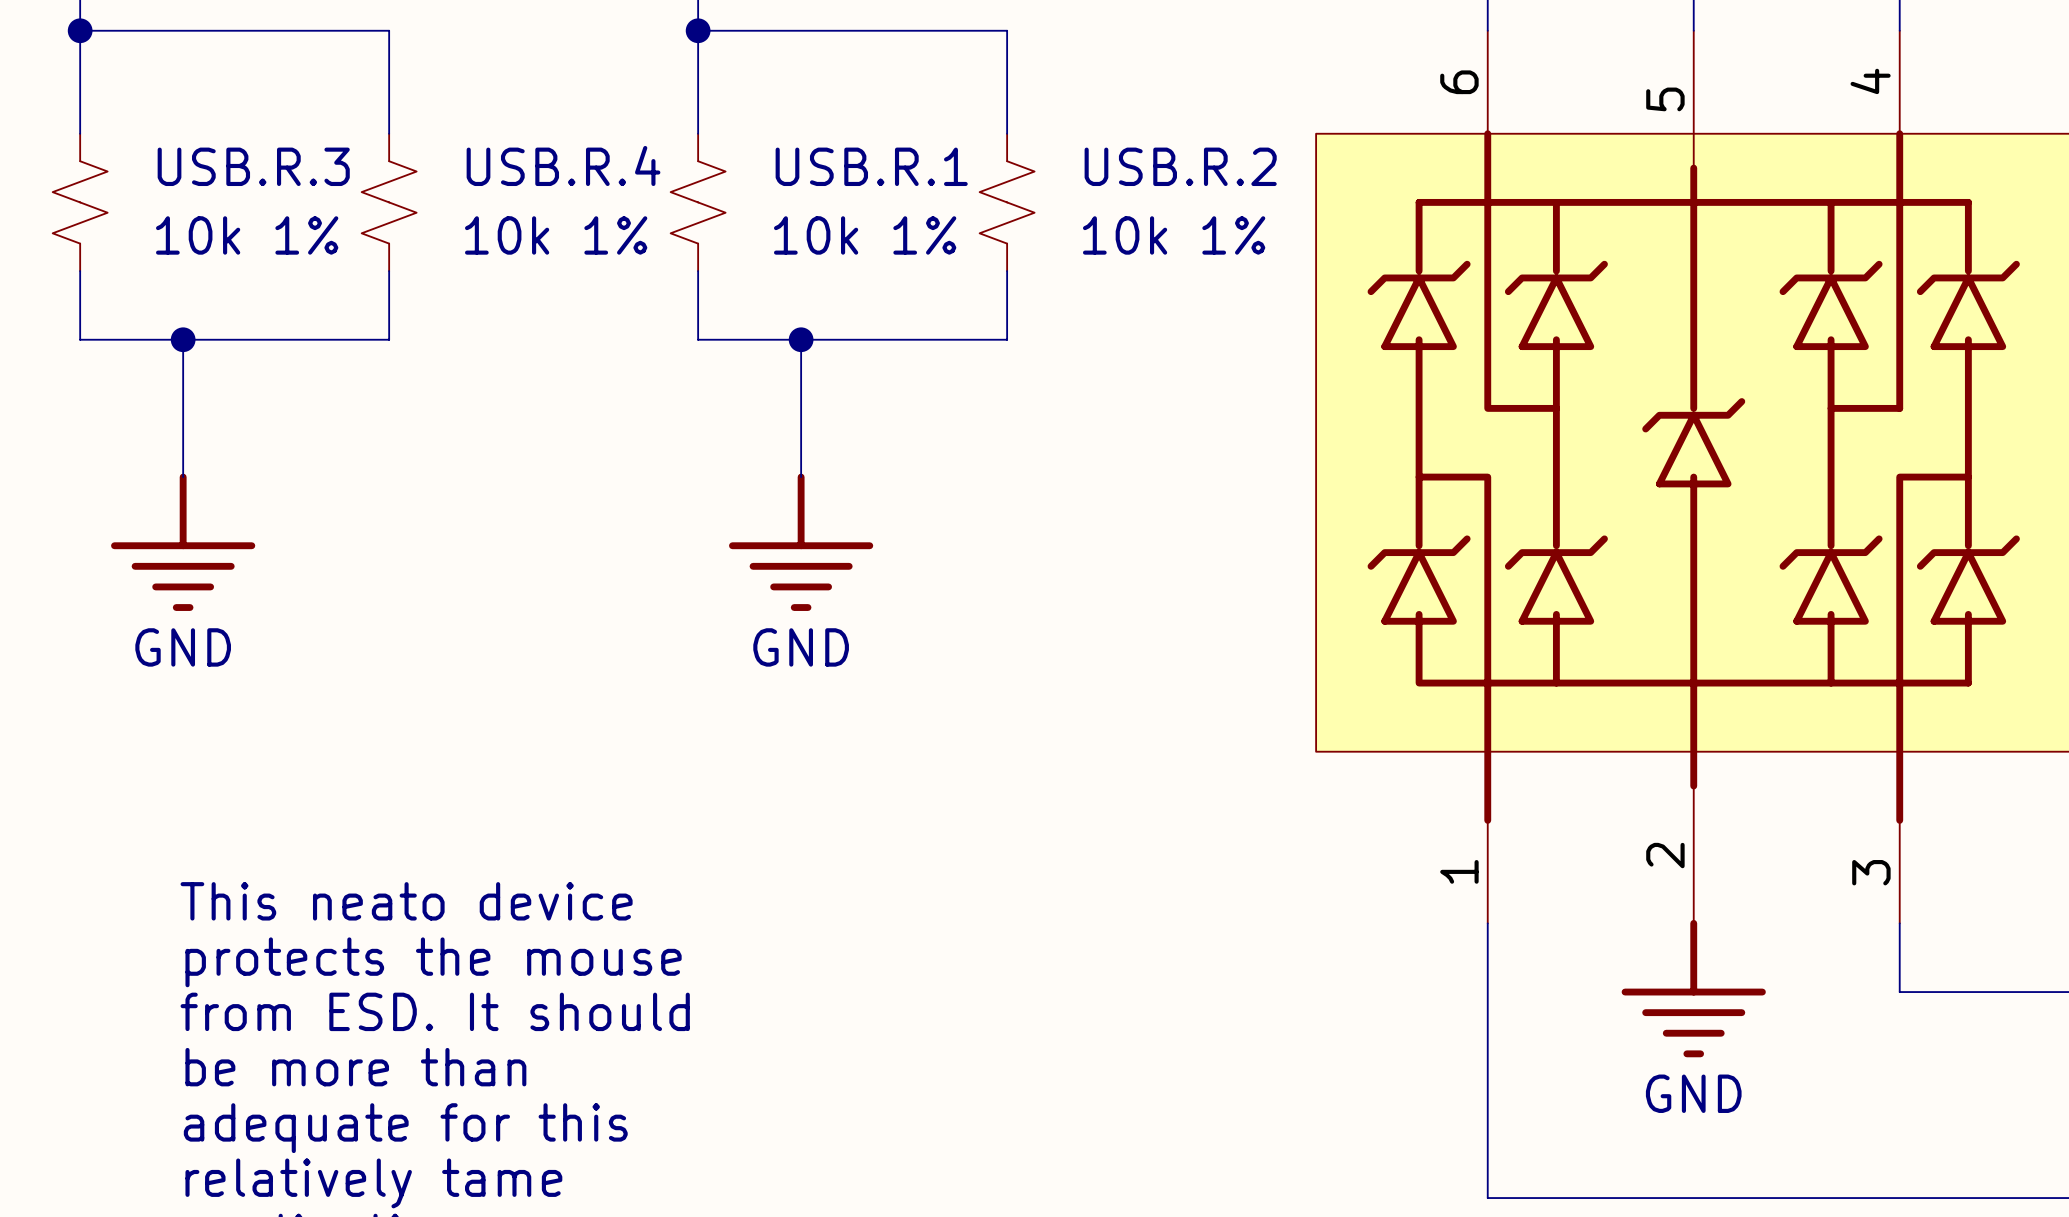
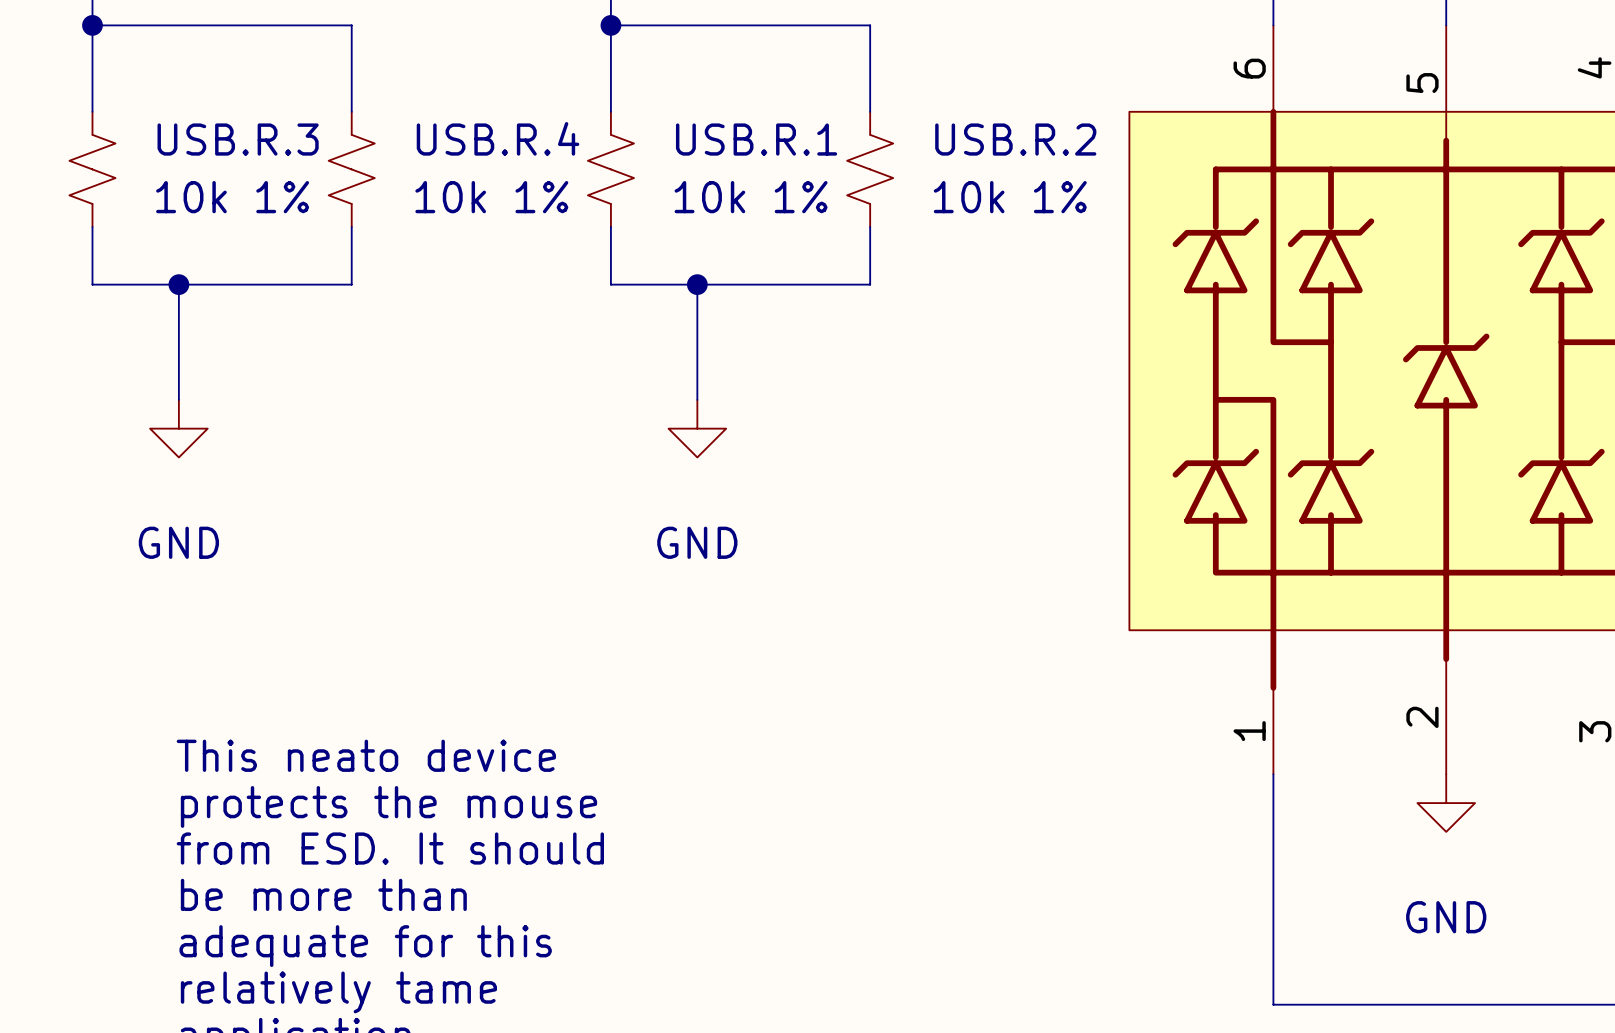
power symbol: none -> GND (178, 428)
power symbol: none -> GND (697, 428)
power symbol: GND (183, 542) -> none
power symbol: GND (801, 542) -> none
power symbol: none -> GND (1446, 803)
power symbol: GND (1693, 988) -> none

